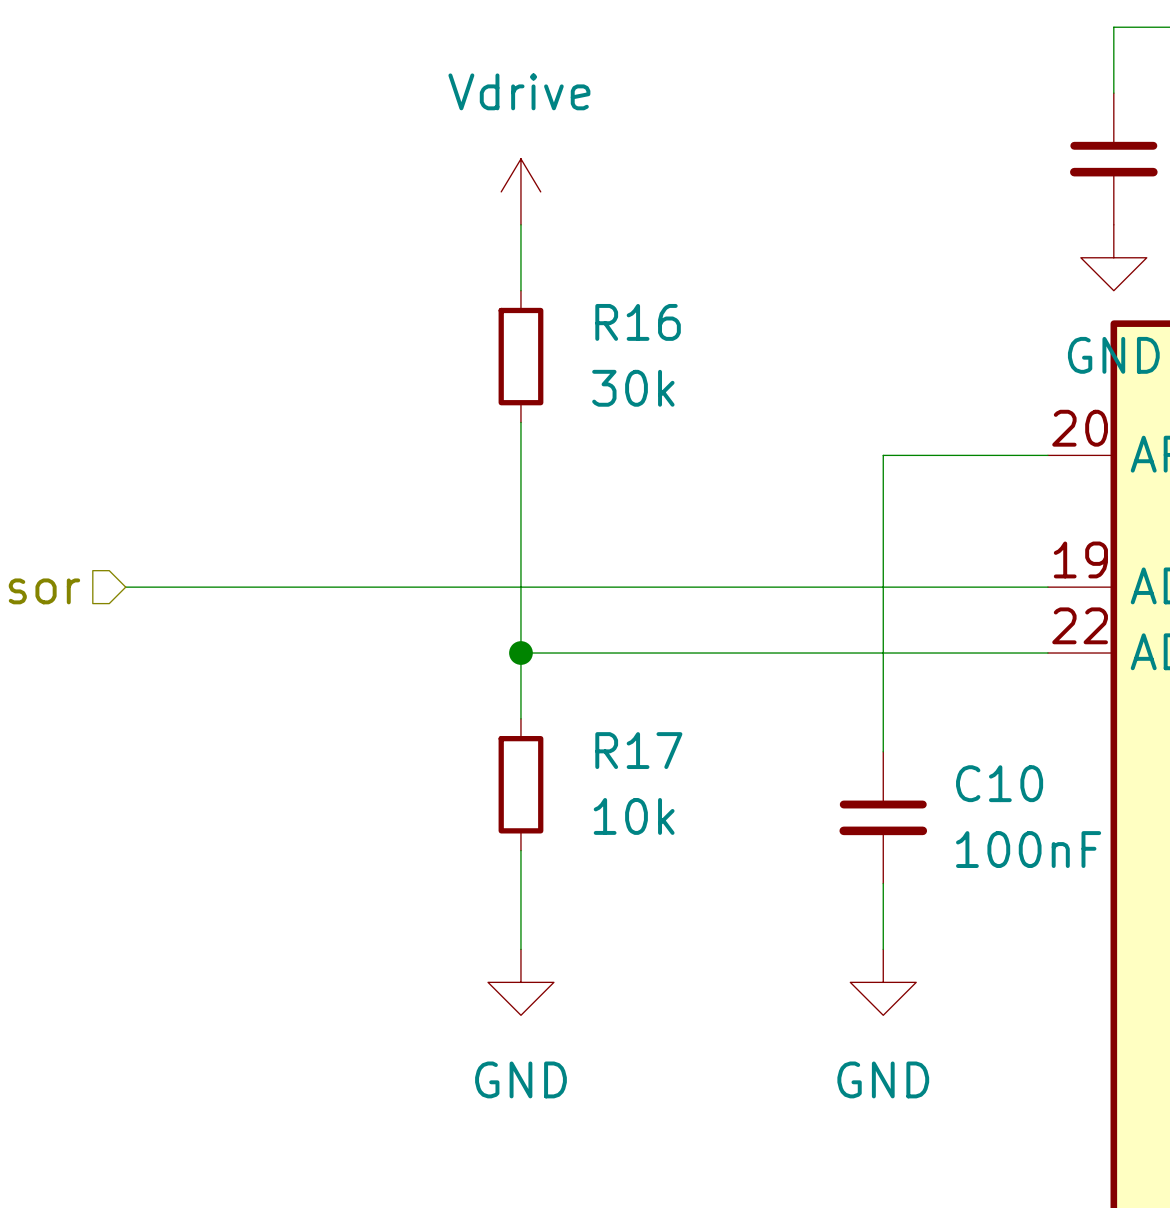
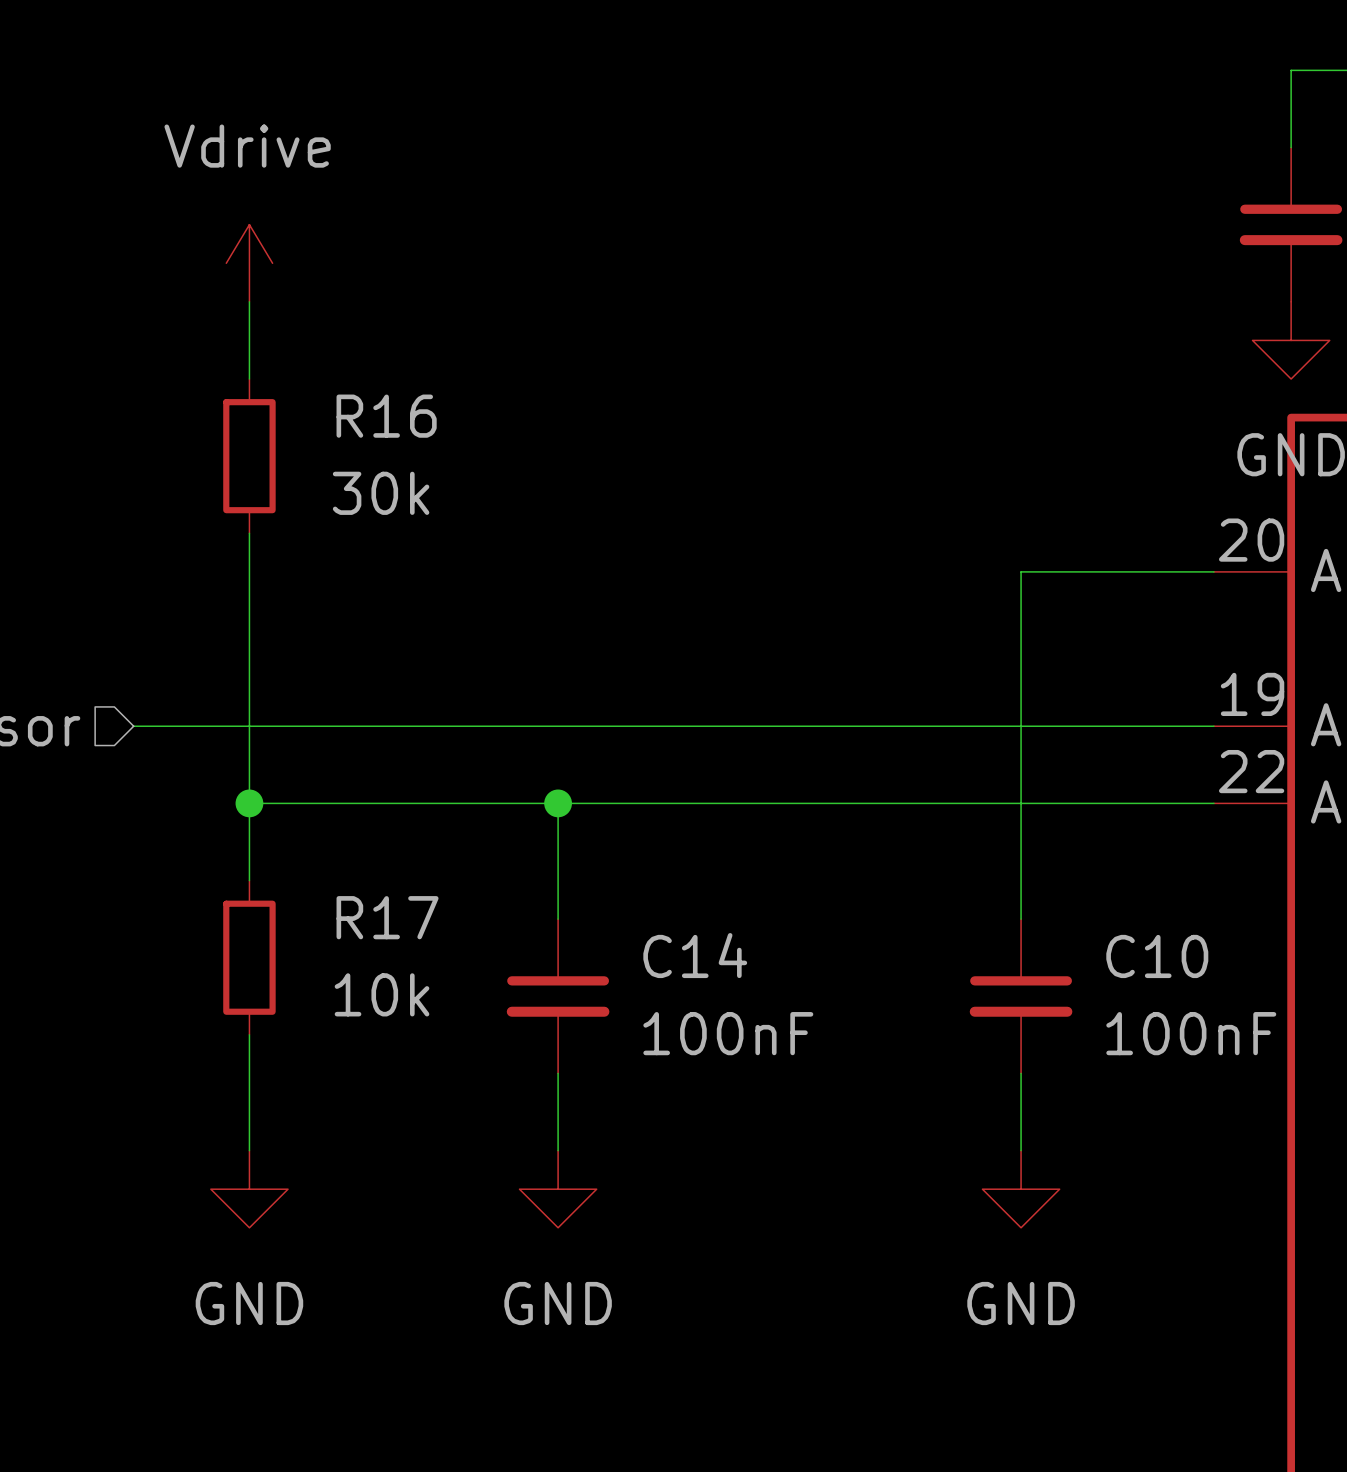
power symbol position: Vdrive (520, 191) -> Vdrive (249, 263)
wire: (520, 224) (520, 290) -> (249, 301) (249, 379)
R16 position: (520, 356) -> (249, 456)
wire: (520, 422) (520, 718) -> (249, 533) (249, 880)
wire: none -> (249, 803) (596, 803)
junction: none -> (249, 803)
wire: none -> (558, 803) (558, 919)
junction position: (520, 653) -> (558, 803)
R17 position: (520, 784) -> (249, 957)
C14: none -> 100nF (558, 996)
wire: (520, 850) (520, 949) -> (249, 1034) (249, 1150)
wire: none -> (558, 1073) (558, 1150)
power symbol: none -> GND (249, 1189)
power symbol position: GND (520, 982) -> GND (558, 1189)

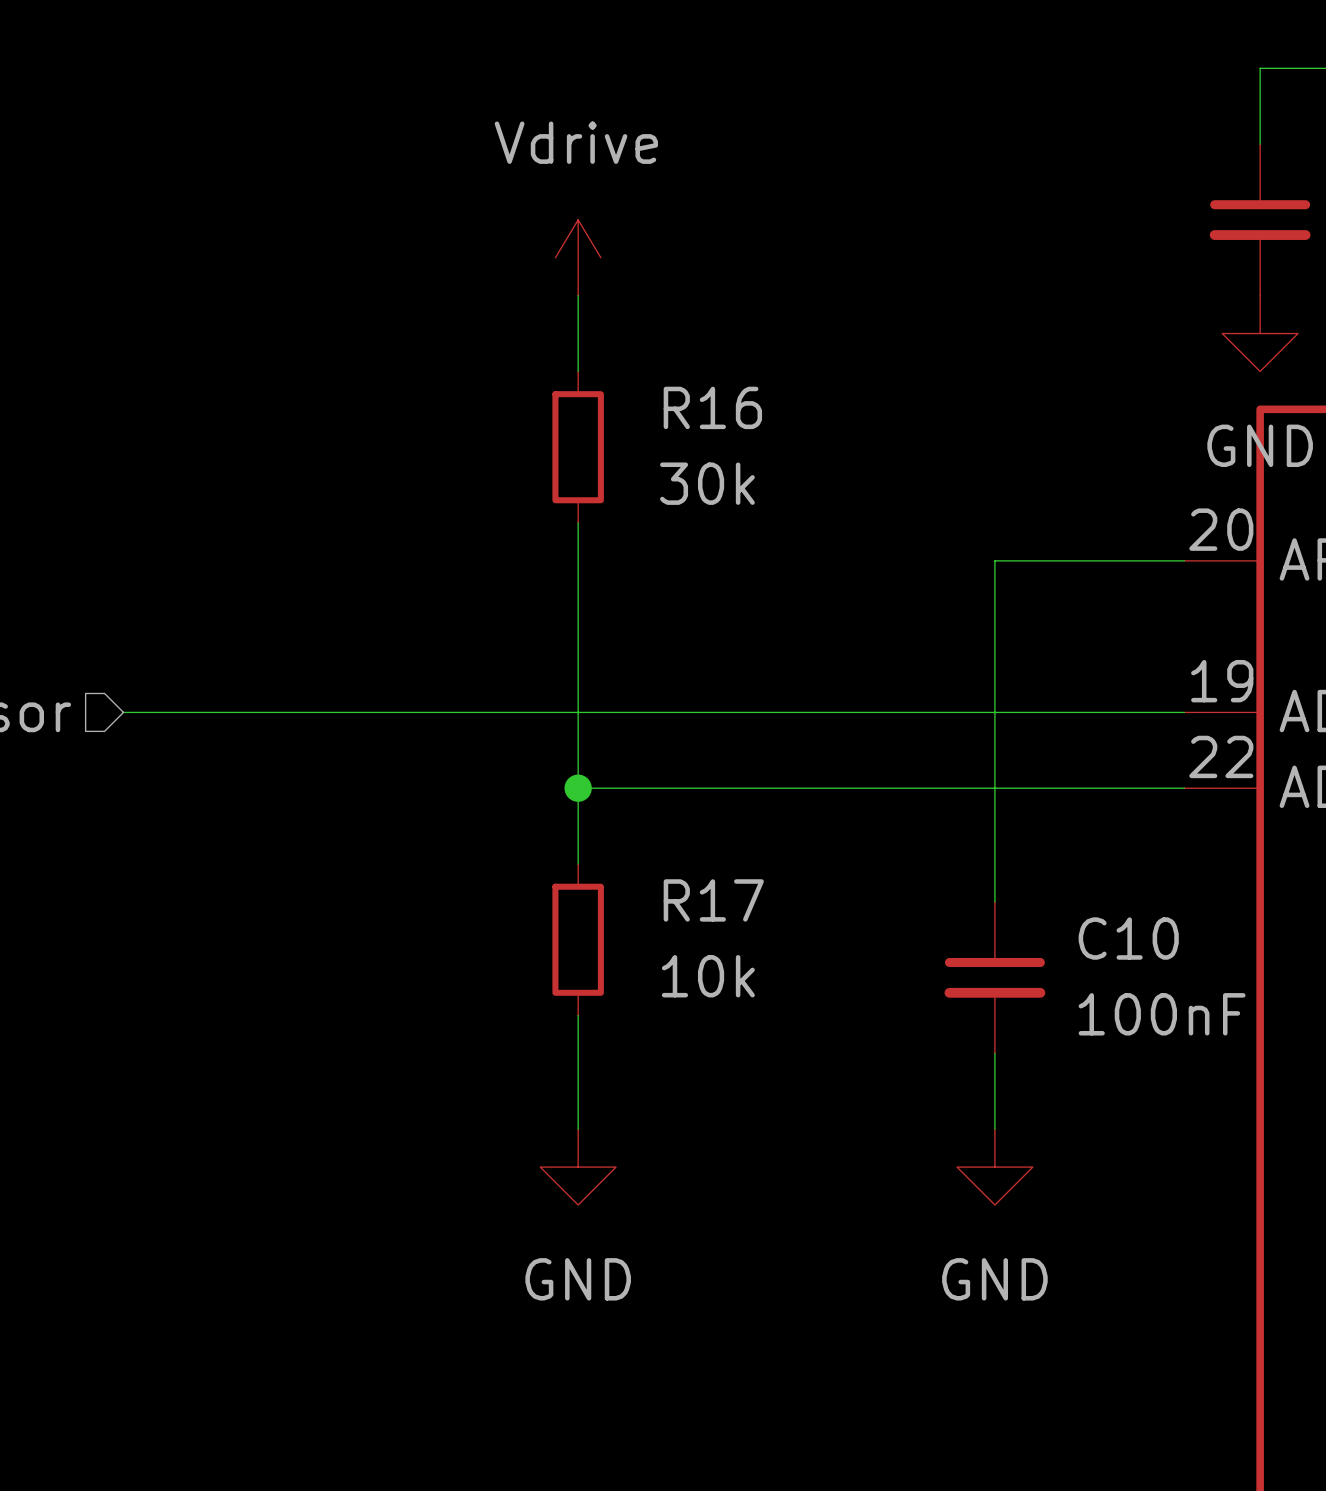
power symbol position: Vdrive (249, 263) -> Vdrive (578, 257)
wire: (249, 301) (249, 379) -> (578, 295) (578, 371)
R16 position: (249, 456) -> (578, 447)
wire: (249, 533) (249, 880) -> (578, 522) (578, 863)
wire: (249, 803) (596, 803) -> none
junction: (249, 803) -> none
wire: (558, 803) (558, 919) -> none
junction position: (558, 803) -> (578, 788)
R17 position: (249, 957) -> (578, 939)
C14: 100nF (558, 996) -> none
wire: (249, 1034) (249, 1150) -> (578, 1015) (578, 1129)
wire: (558, 1073) (558, 1150) -> none
power symbol: GND (249, 1189) -> none
power symbol position: GND (558, 1189) -> GND (578, 1167)

